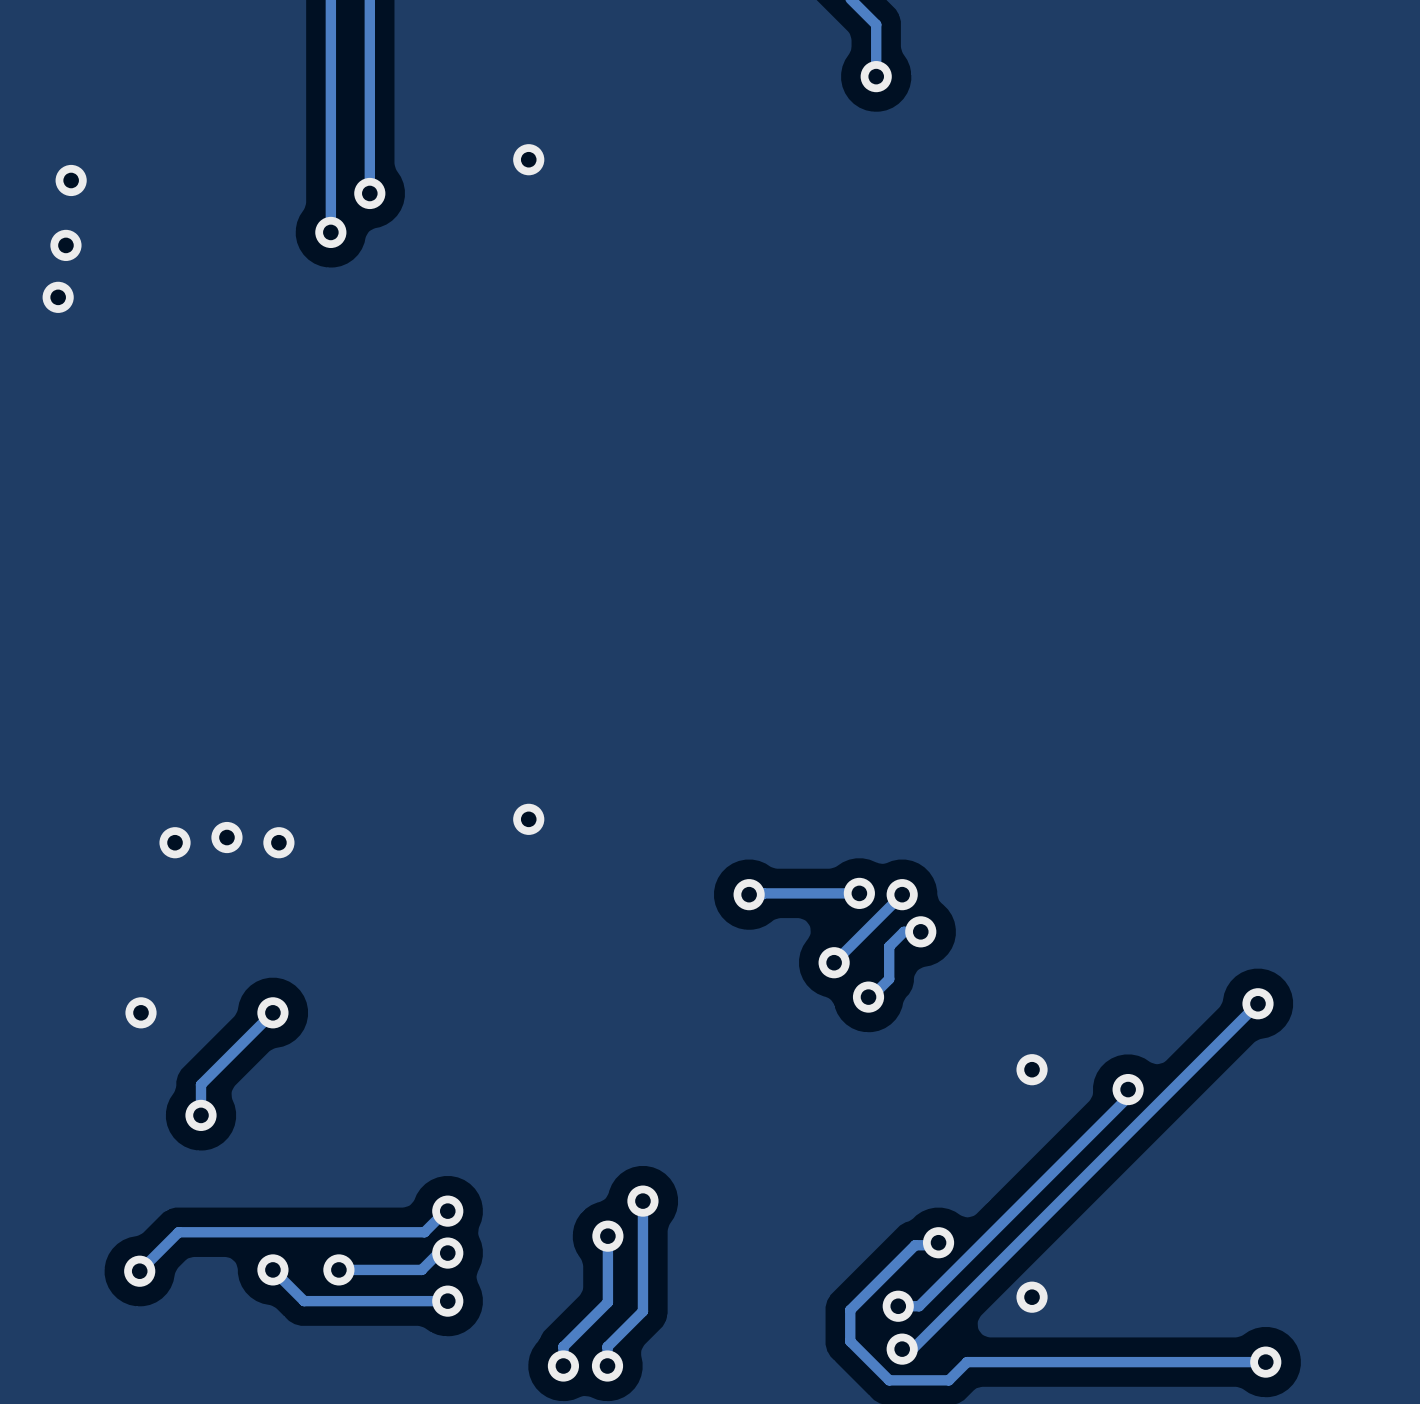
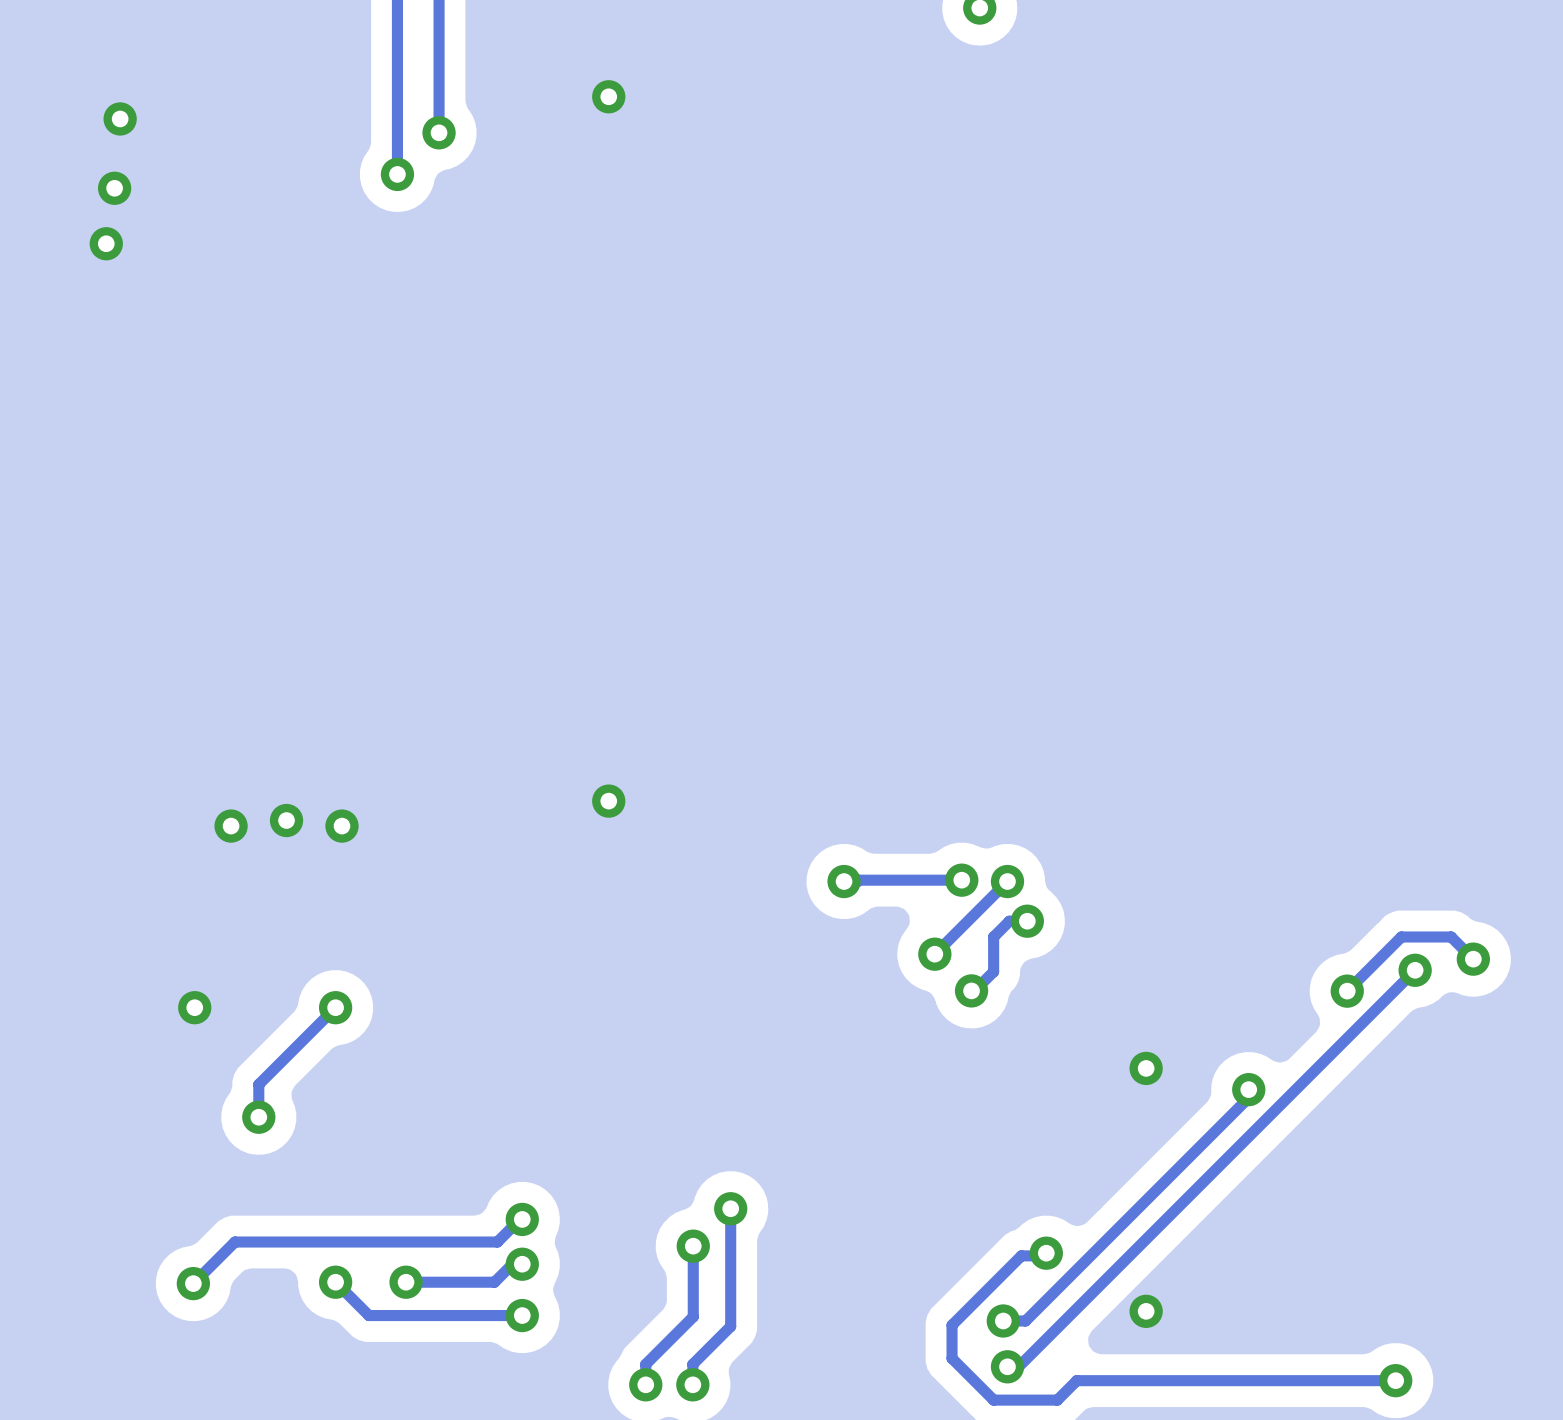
track: none -> (1473, 959) (1451, 936) (1401, 936) (1347, 991)
via: none -> (1473, 959)
track: none -> (1415, 970) (1387, 998)
via: none -> (1347, 991)
via position: (1258, 1003) -> (1415, 970)

